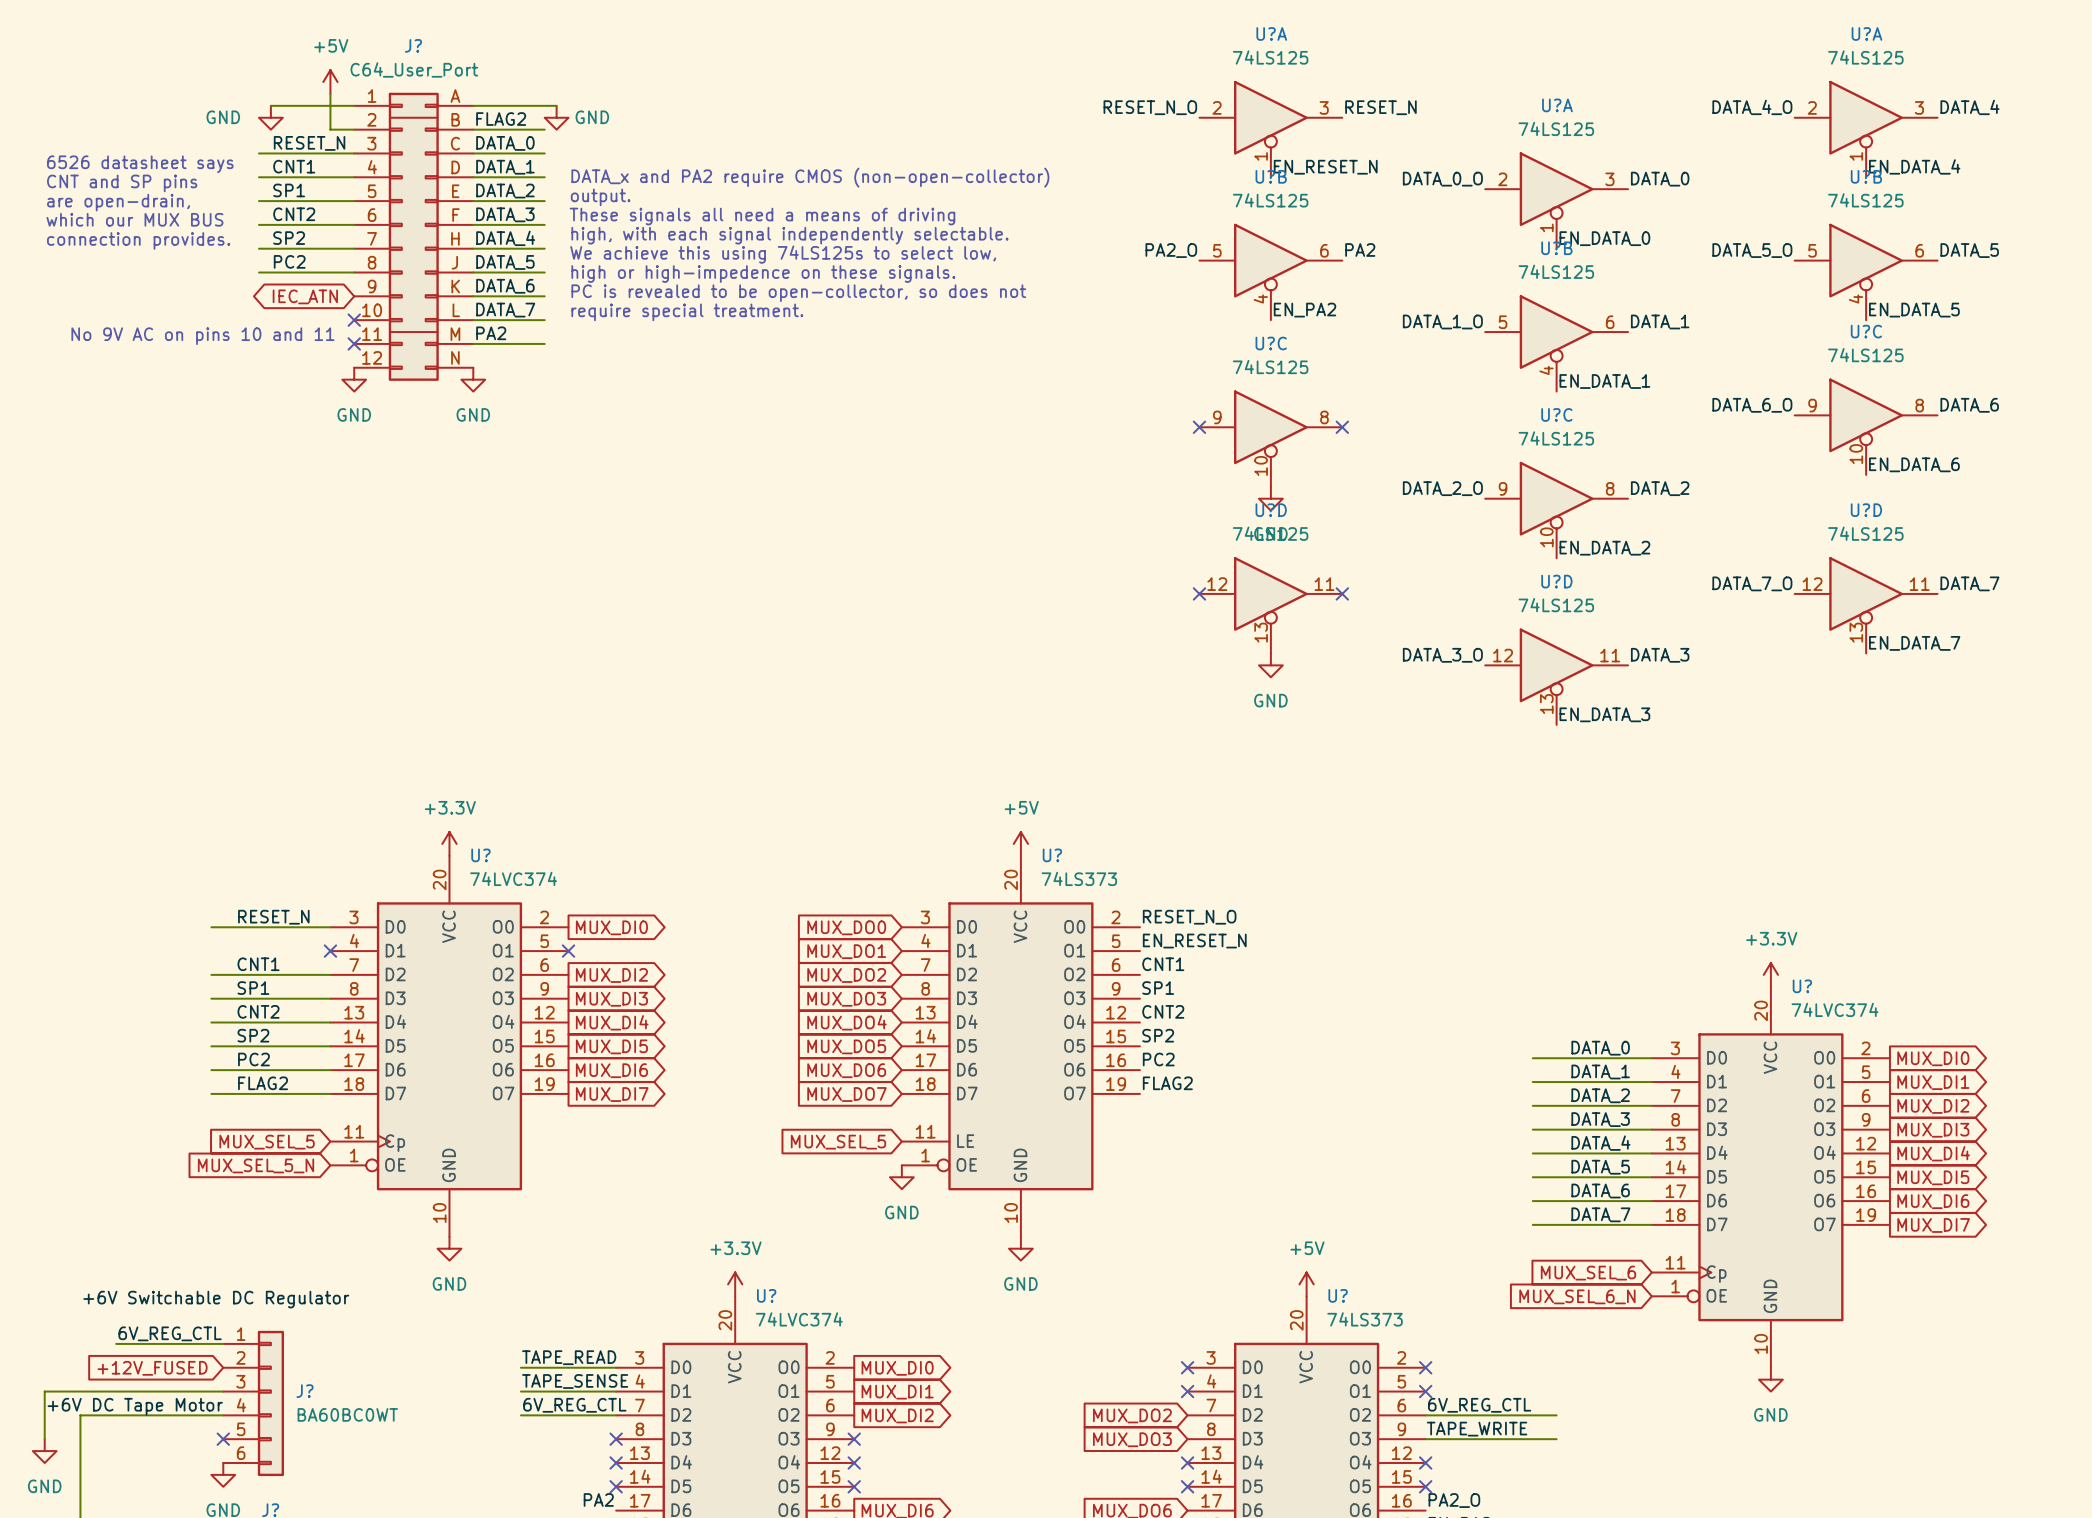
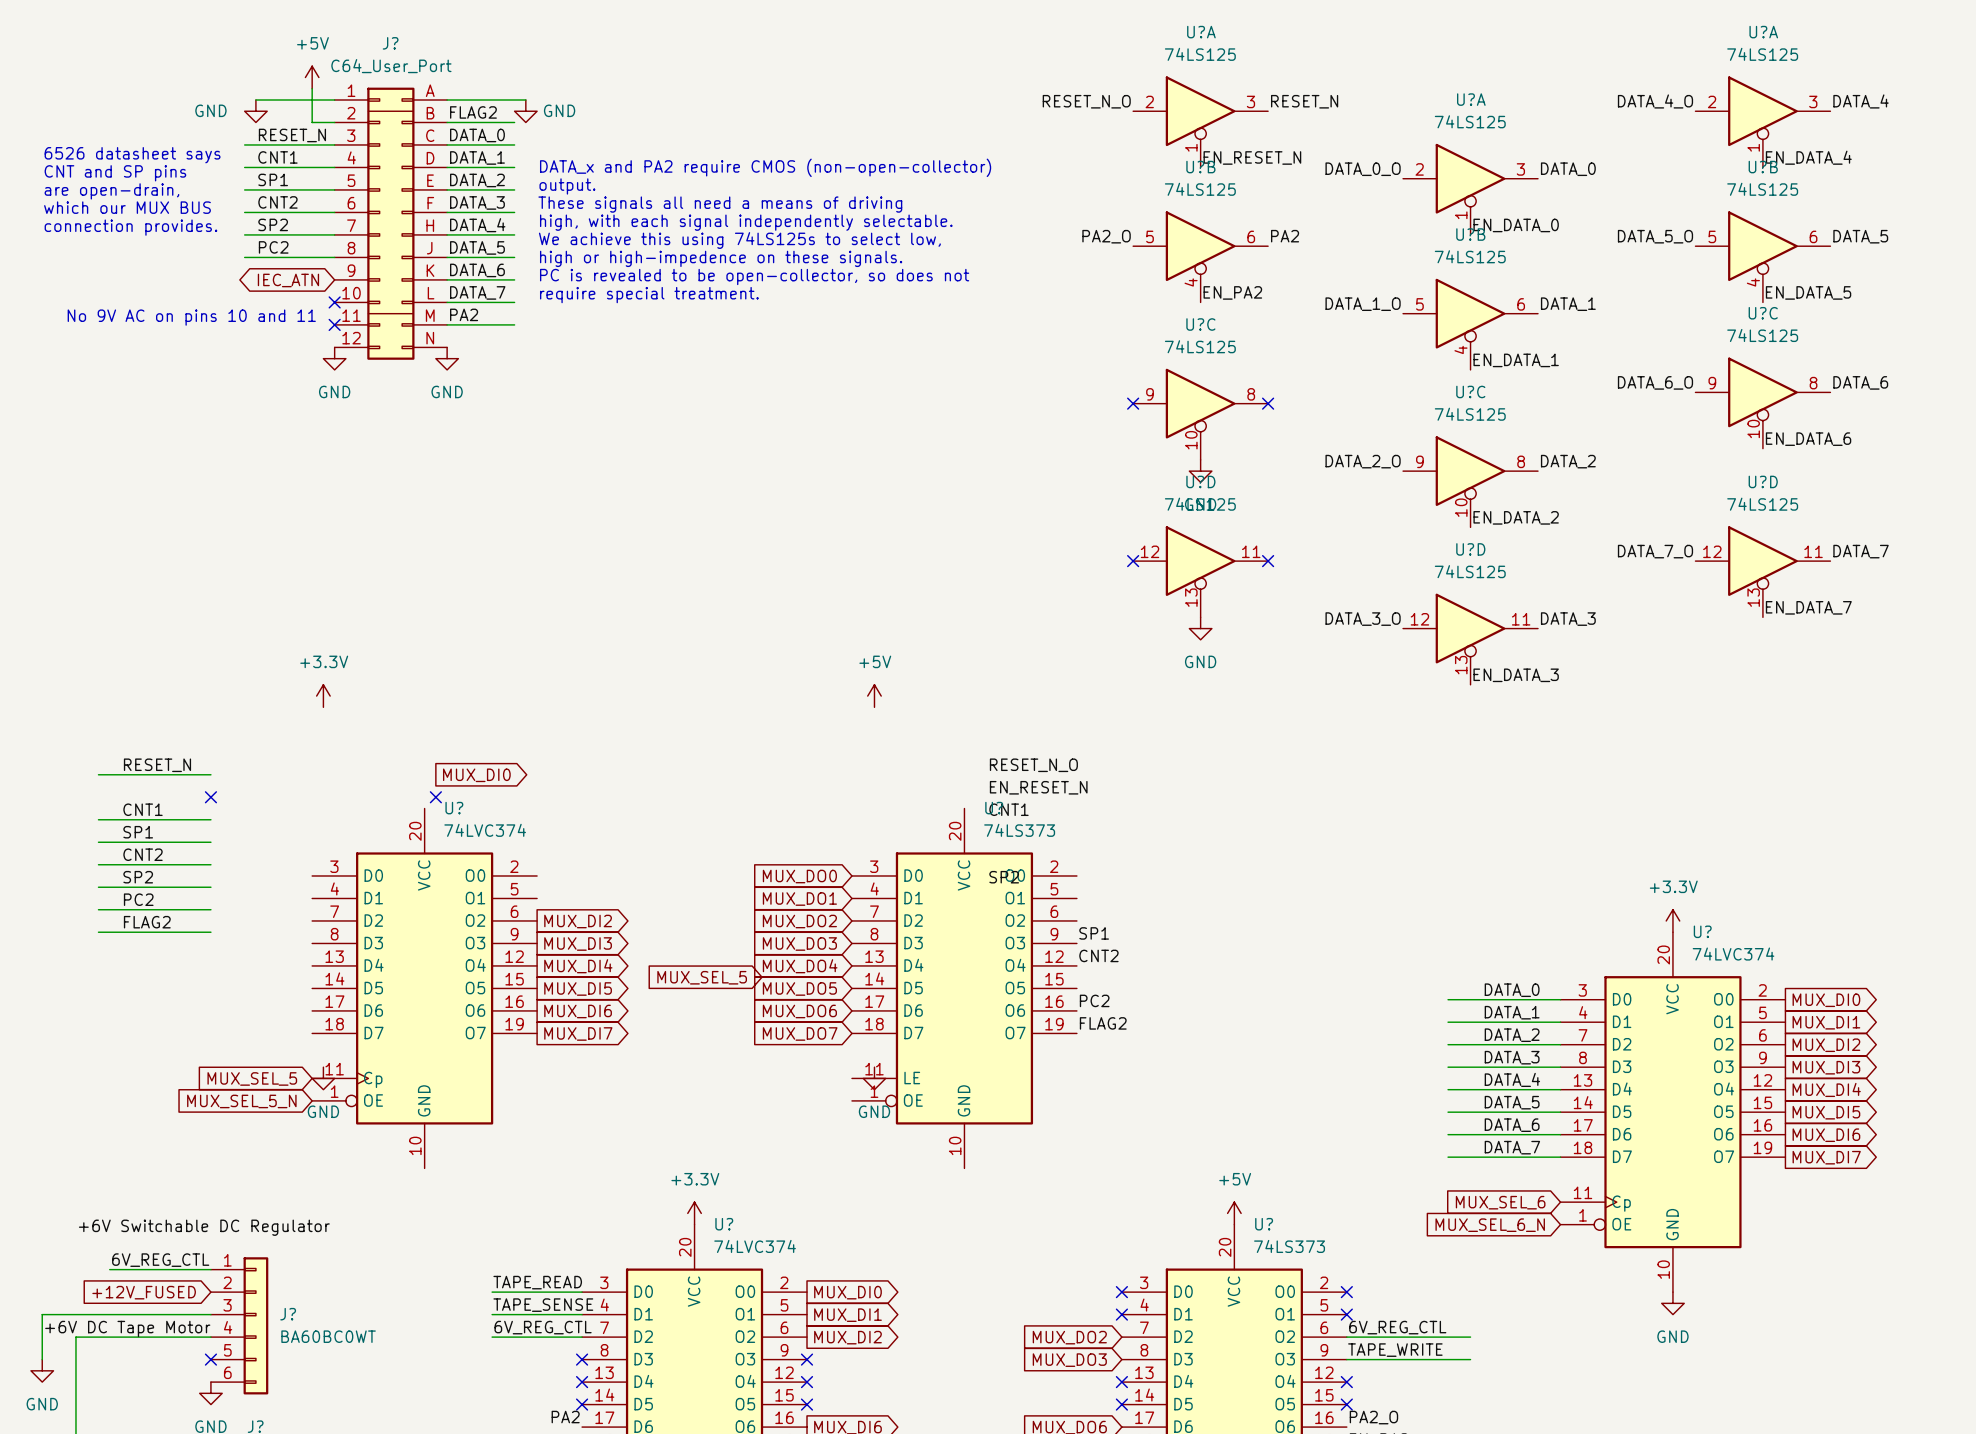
no-connect mark: none -> (210, 797)
power symbol position: +3.3V (449, 843) -> +3.3V (323, 696)
no-connect mark: none -> (435, 797)
power symbol position: +5V (1020, 843) -> +5V (874, 696)
label position: RESET_N (273, 917) -> RESET_N (157, 765)
label position: RESET_N_O (1189, 917) -> RESET_N_O (1033, 765)
wire: (211, 927) (330, 927) -> (98, 774) (210, 774)
global label position: MUX_DI0 (611, 927) -> MUX_DI0 (476, 775)
label position: EN_RESET_N (1194, 941) -> EN_RESET_N (1038, 787)
no-connect mark: (330, 951) -> none
no-connect mark: (568, 951) -> none
label position: CNT1 (258, 964) -> CNT1 (143, 809)
label position: CNT1 (1163, 964) -> CNT1 (1008, 809)
wire: (211, 974) (330, 974) -> (98, 819) (210, 819)
label position: SP1 (253, 988) -> SP1 (138, 832)
wire: (211, 998) (330, 998) -> (98, 842) (210, 842)
label position: CNT2 (258, 1011) -> CNT2 (143, 854)
wire: (211, 1022) (330, 1022) -> (98, 864) (210, 864)
label position: SP2 (253, 1035) -> SP2 (138, 877)
label position: SP2 (1158, 1035) -> SP2 (1004, 877)
wire: (211, 1046) (330, 1046) -> (98, 887) (210, 887)
label position: PC2 (253, 1059) -> PC2 (138, 899)
wire: (211, 1070) (330, 1070) -> (98, 909) (210, 909)
label position: FLAG2 (263, 1083) -> FLAG2 (147, 922)
wire: (211, 1093) (330, 1093) -> (98, 932) (210, 932)
global label position: MUX_SEL_5 (838, 1142) -> MUX_SEL_5 (702, 977)
power symbol position: GND (901, 1177) -> GND (874, 1078)
power symbol position: GND (449, 1248) -> GND (323, 1078)
power symbol: GND (1020, 1248) -> none

